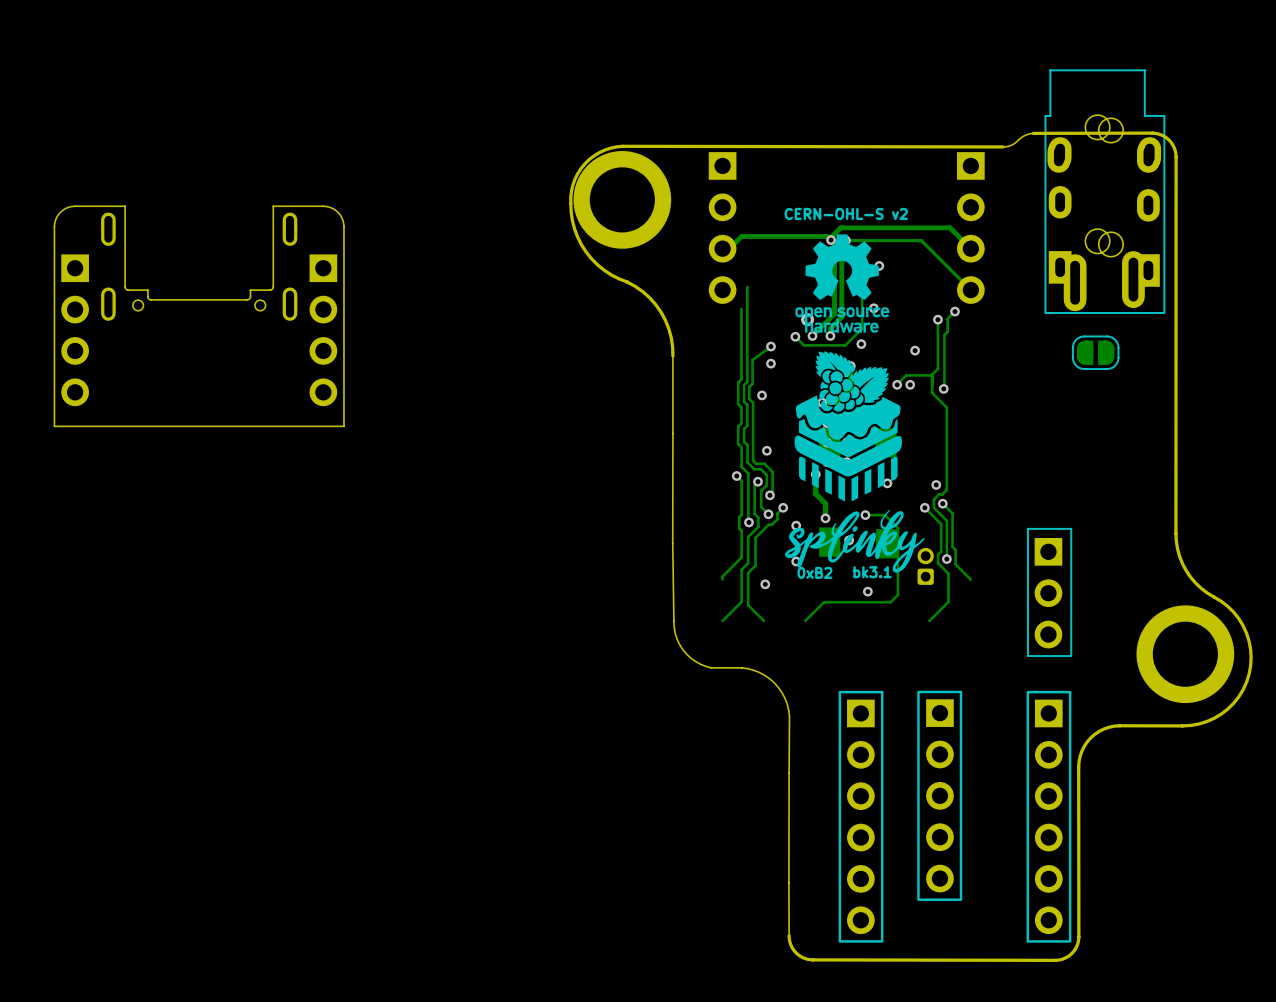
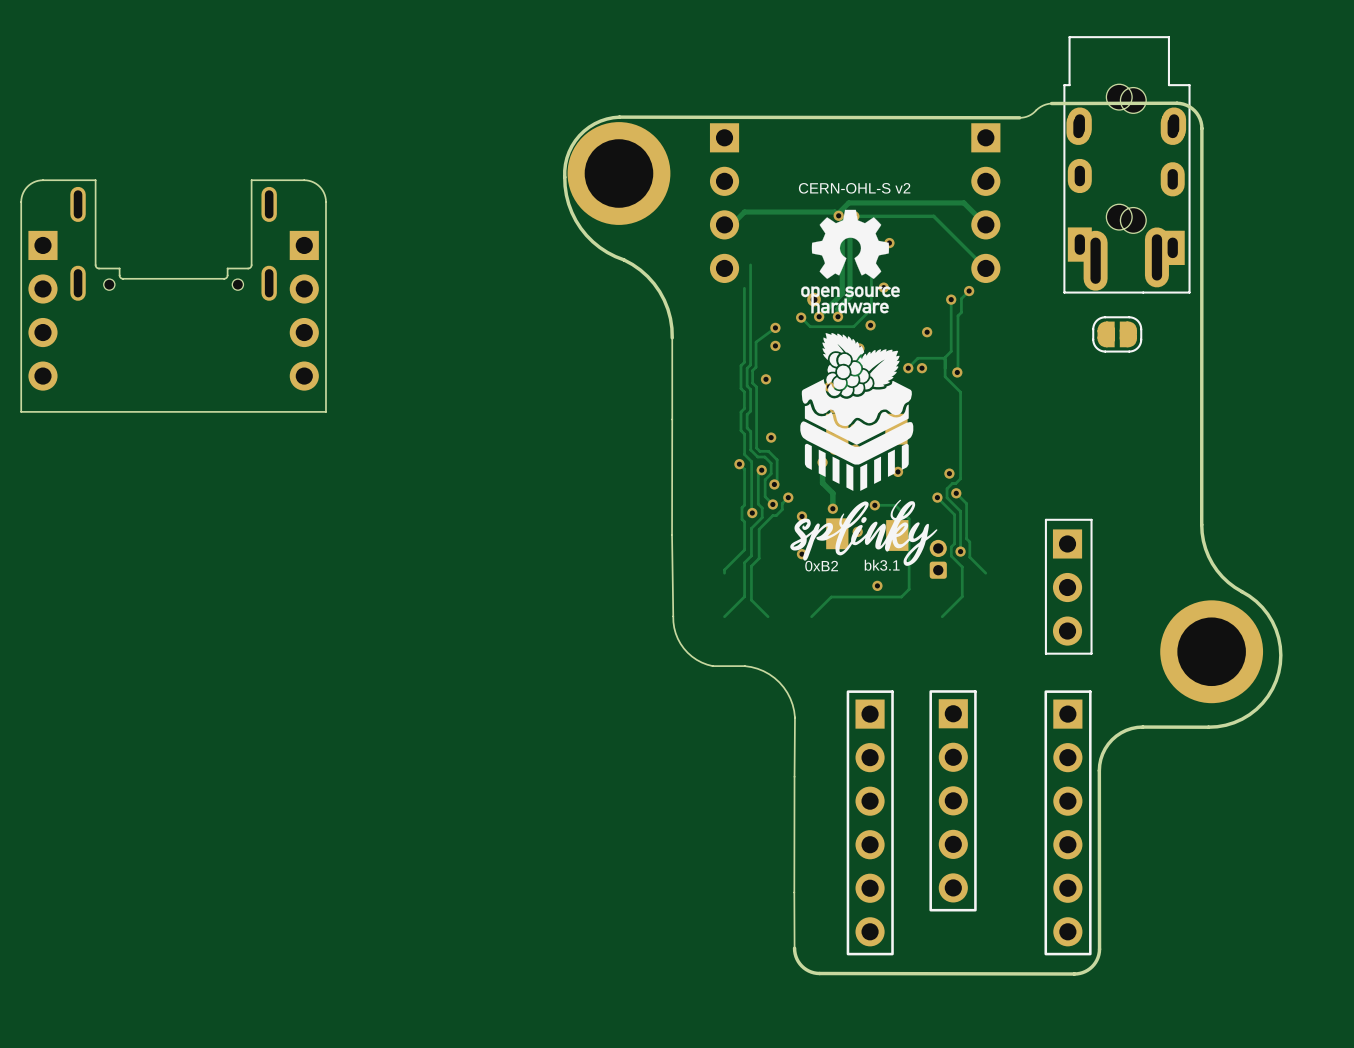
via: (765, 584) -> none

